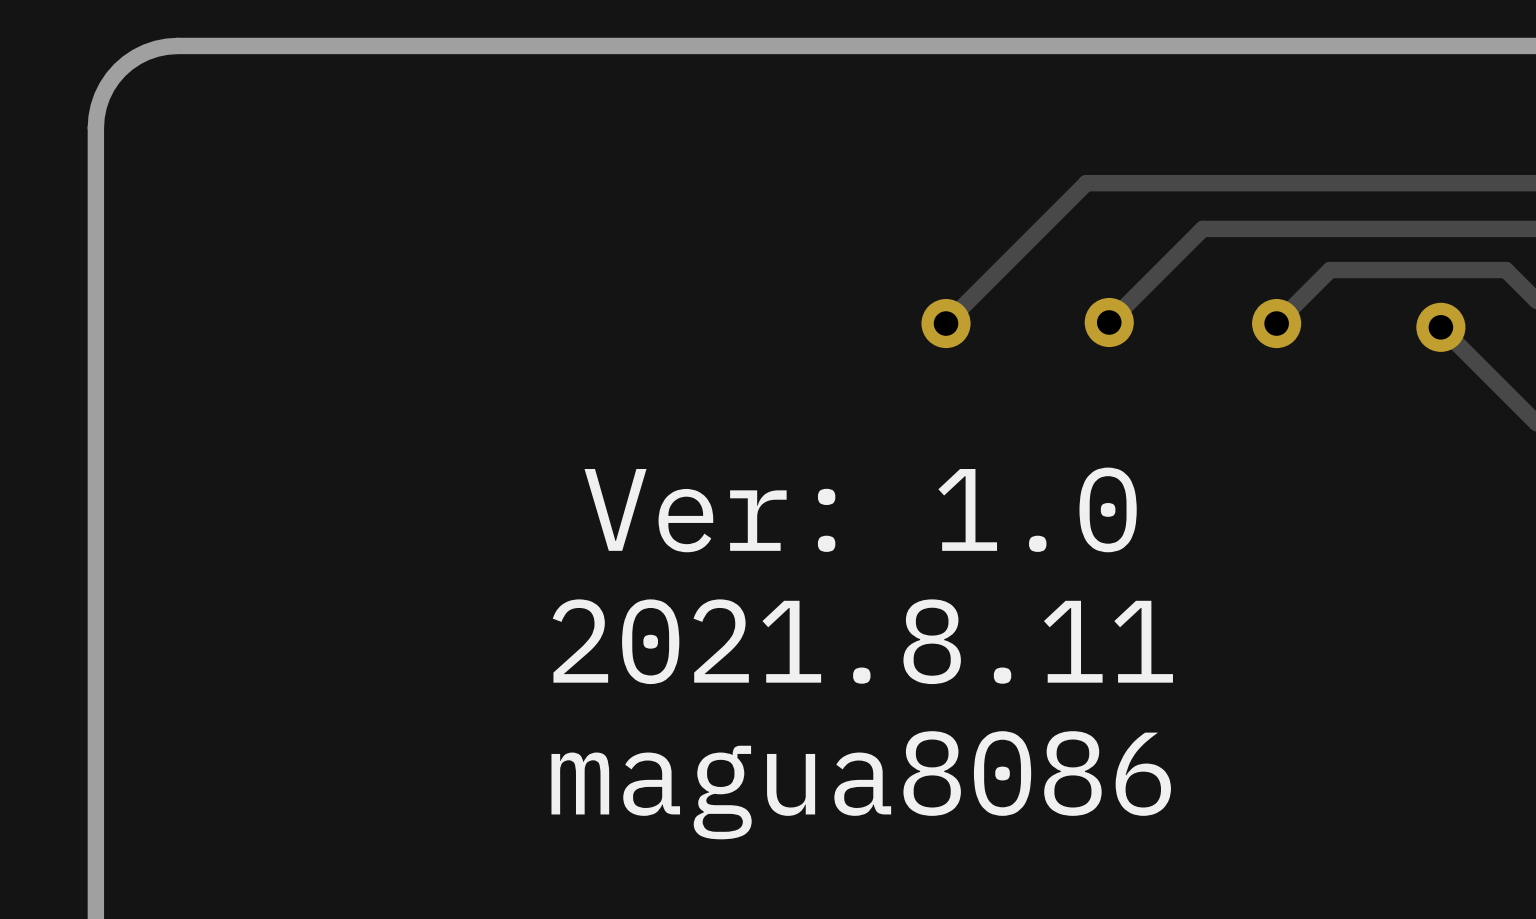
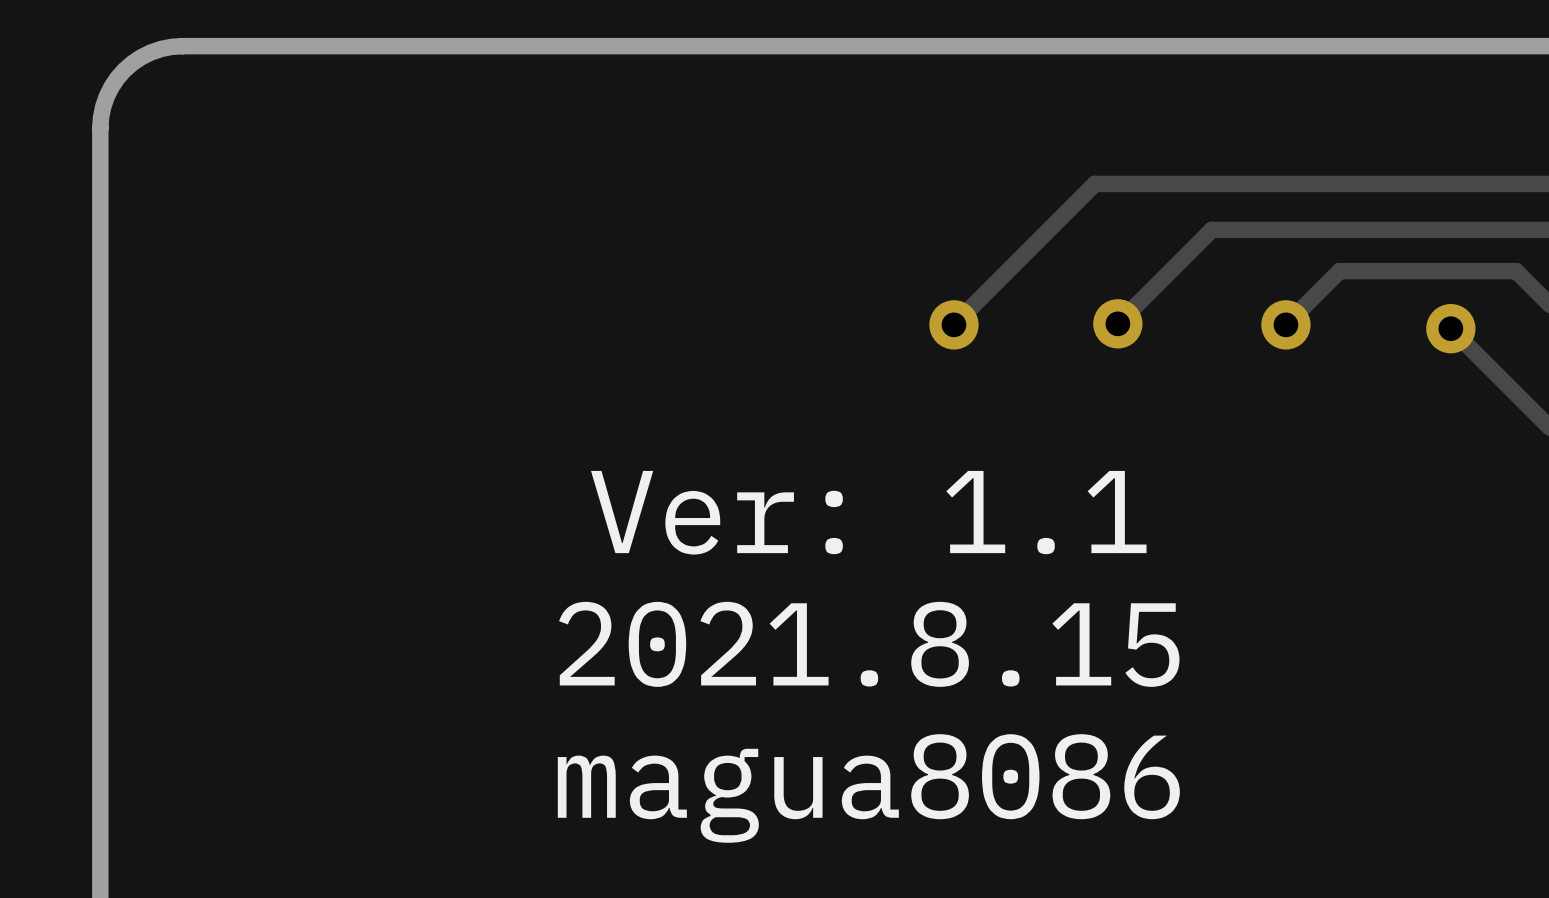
text: Ver: 1.0 (860, 509) -> Ver: 1.1 (868, 512)
text: 2021.8.11 (862, 641) -> 2021.8.15 (869, 644)

